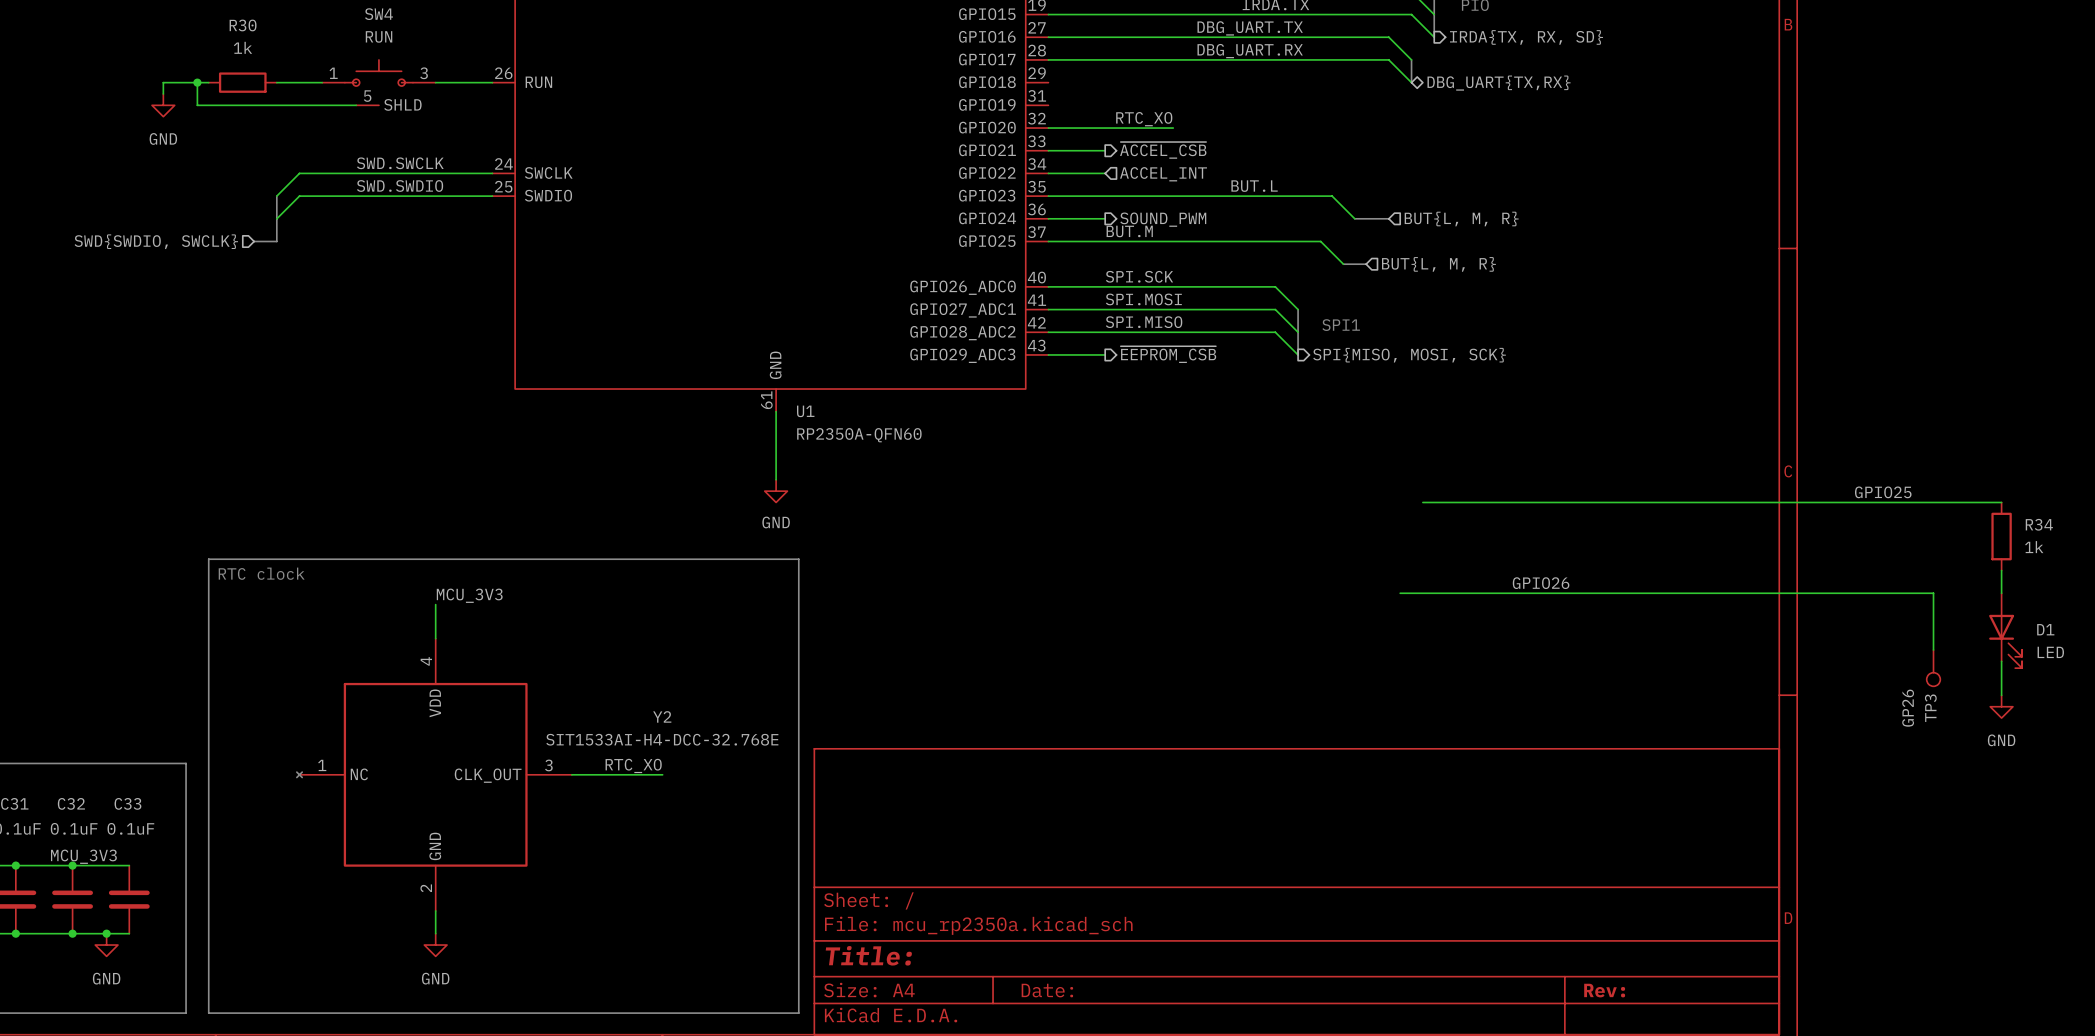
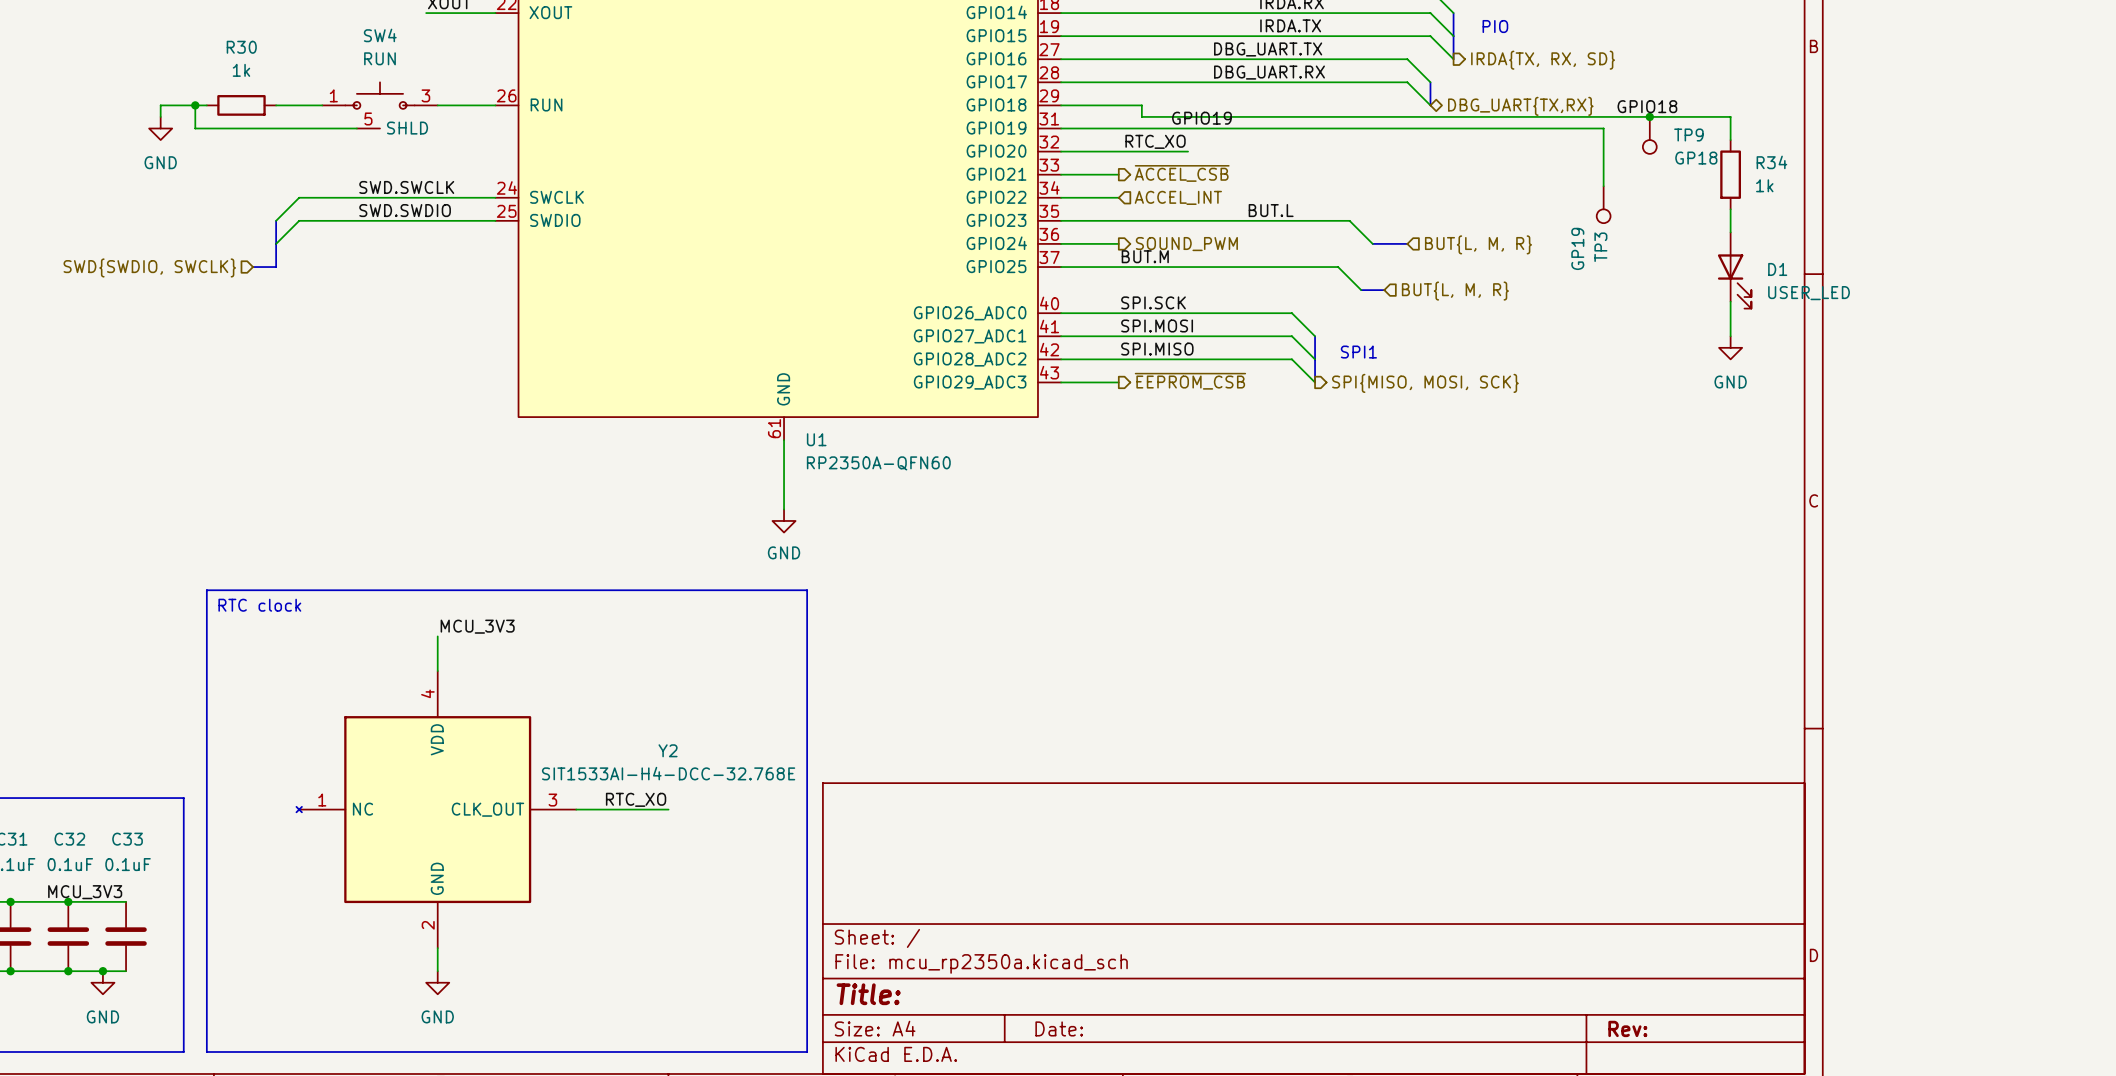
wire: none -> (1061, 105) (1141, 105) (1141, 116) (1730, 116) (1730, 140)
label: none -> GPIO18 (1647, 106)
junction: none -> (1649, 116)
label: none -> GPIO19 (1201, 118)
wire: none -> (1061, 128) (1603, 128) (1603, 186)
TP9: none -> GP18 (1649, 135)
wire: none -> (1730, 209) (1730, 232)
wire: none -> (1730, 301) (1730, 336)
power symbol: none -> GND (1730, 347)
label: GPIO25 (1883, 492) -> none
wire: (1422, 502) (2001, 502) -> none
R34 position: (2001, 536) -> (1730, 174)
wire: (2001, 570) (2001, 593) -> none
label: GPIO26 (1541, 583) -> none
wire: (1400, 593) (1933, 593) (1933, 650) -> none
D1 position: (2005, 630) -> (1734, 270)
D1 value: LED (2050, 652) -> USER_LED (1809, 293)
wire: (2001, 661) (2001, 695) -> none
TP3 position: (1933, 668) -> (1603, 204)
power symbol: GND (2001, 706) -> none
TP3 value: GP26 (1908, 708) -> GP19 (1577, 248)

